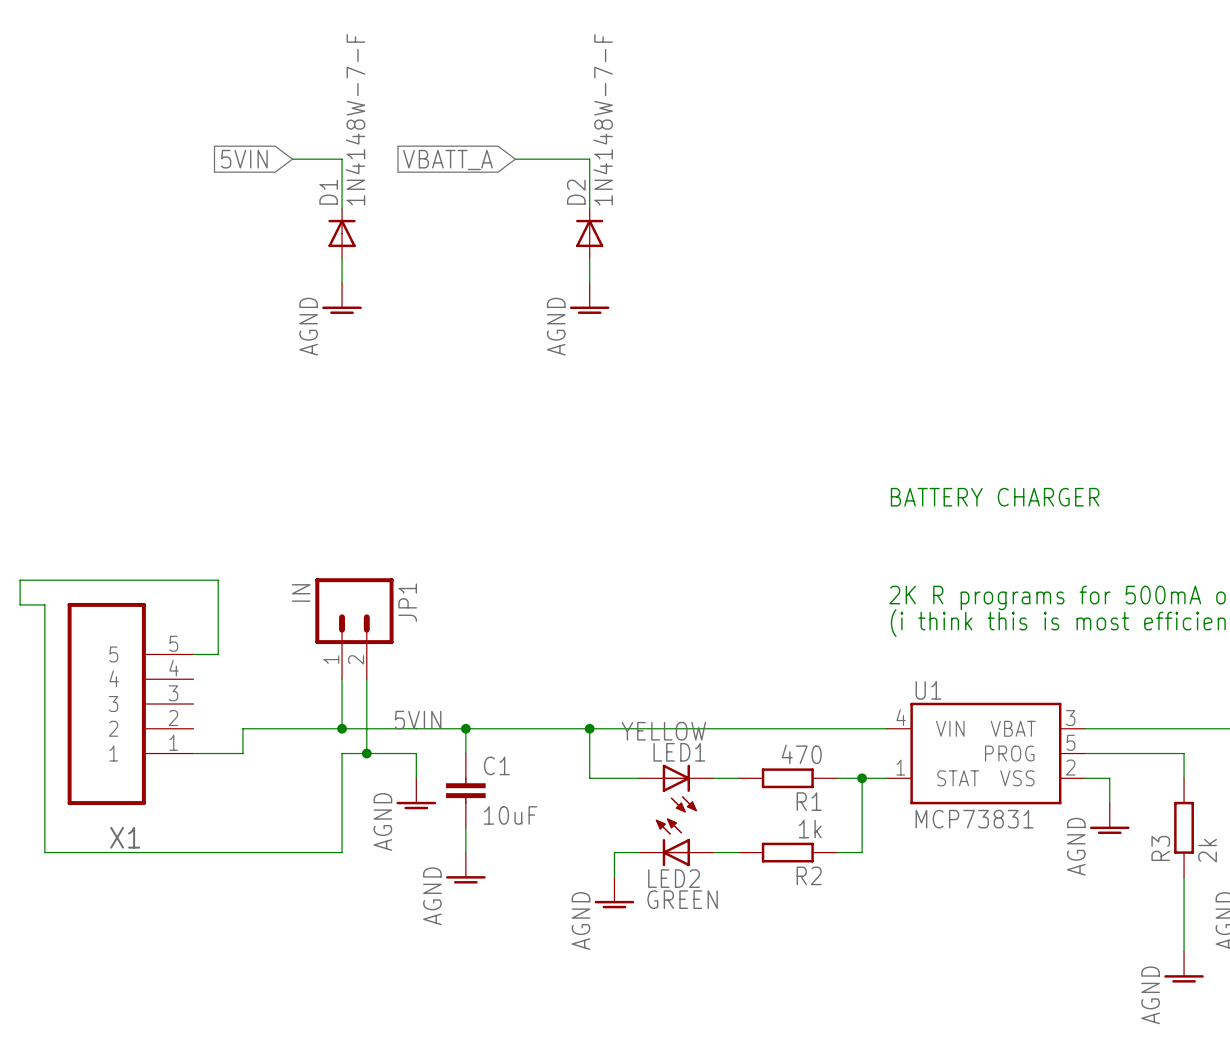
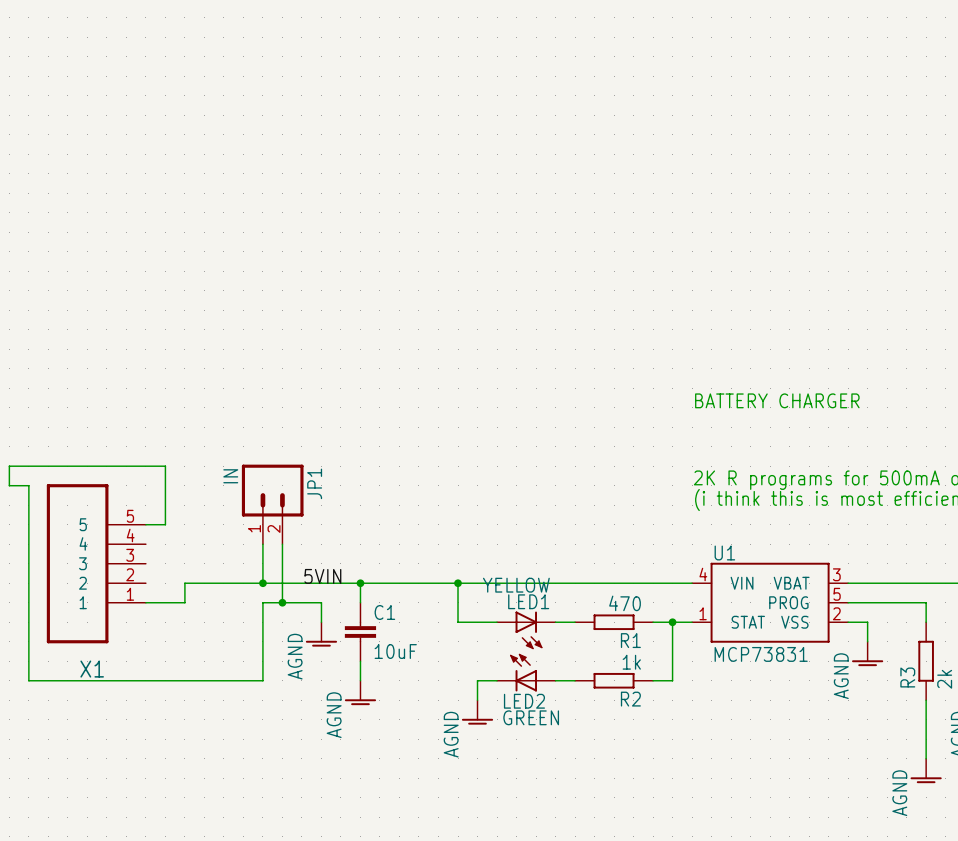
global label: 5VIN (244, 159) -> none
wire: (292, 159) (342, 159) (342, 208) -> none
wire: (515, 159) (589, 159) (589, 208) -> none
global label: VBATT_A (447, 160) -> none
D1: 1N4148W-7-F (342, 233) -> none
D2: 1N4148W-7-F (589, 233) -> none
wire: (342, 258) (342, 283) -> none
wire: (589, 258) (589, 283) -> none
power symbol: AGND (342, 298) -> none
power symbol: AGND (589, 298) -> none

